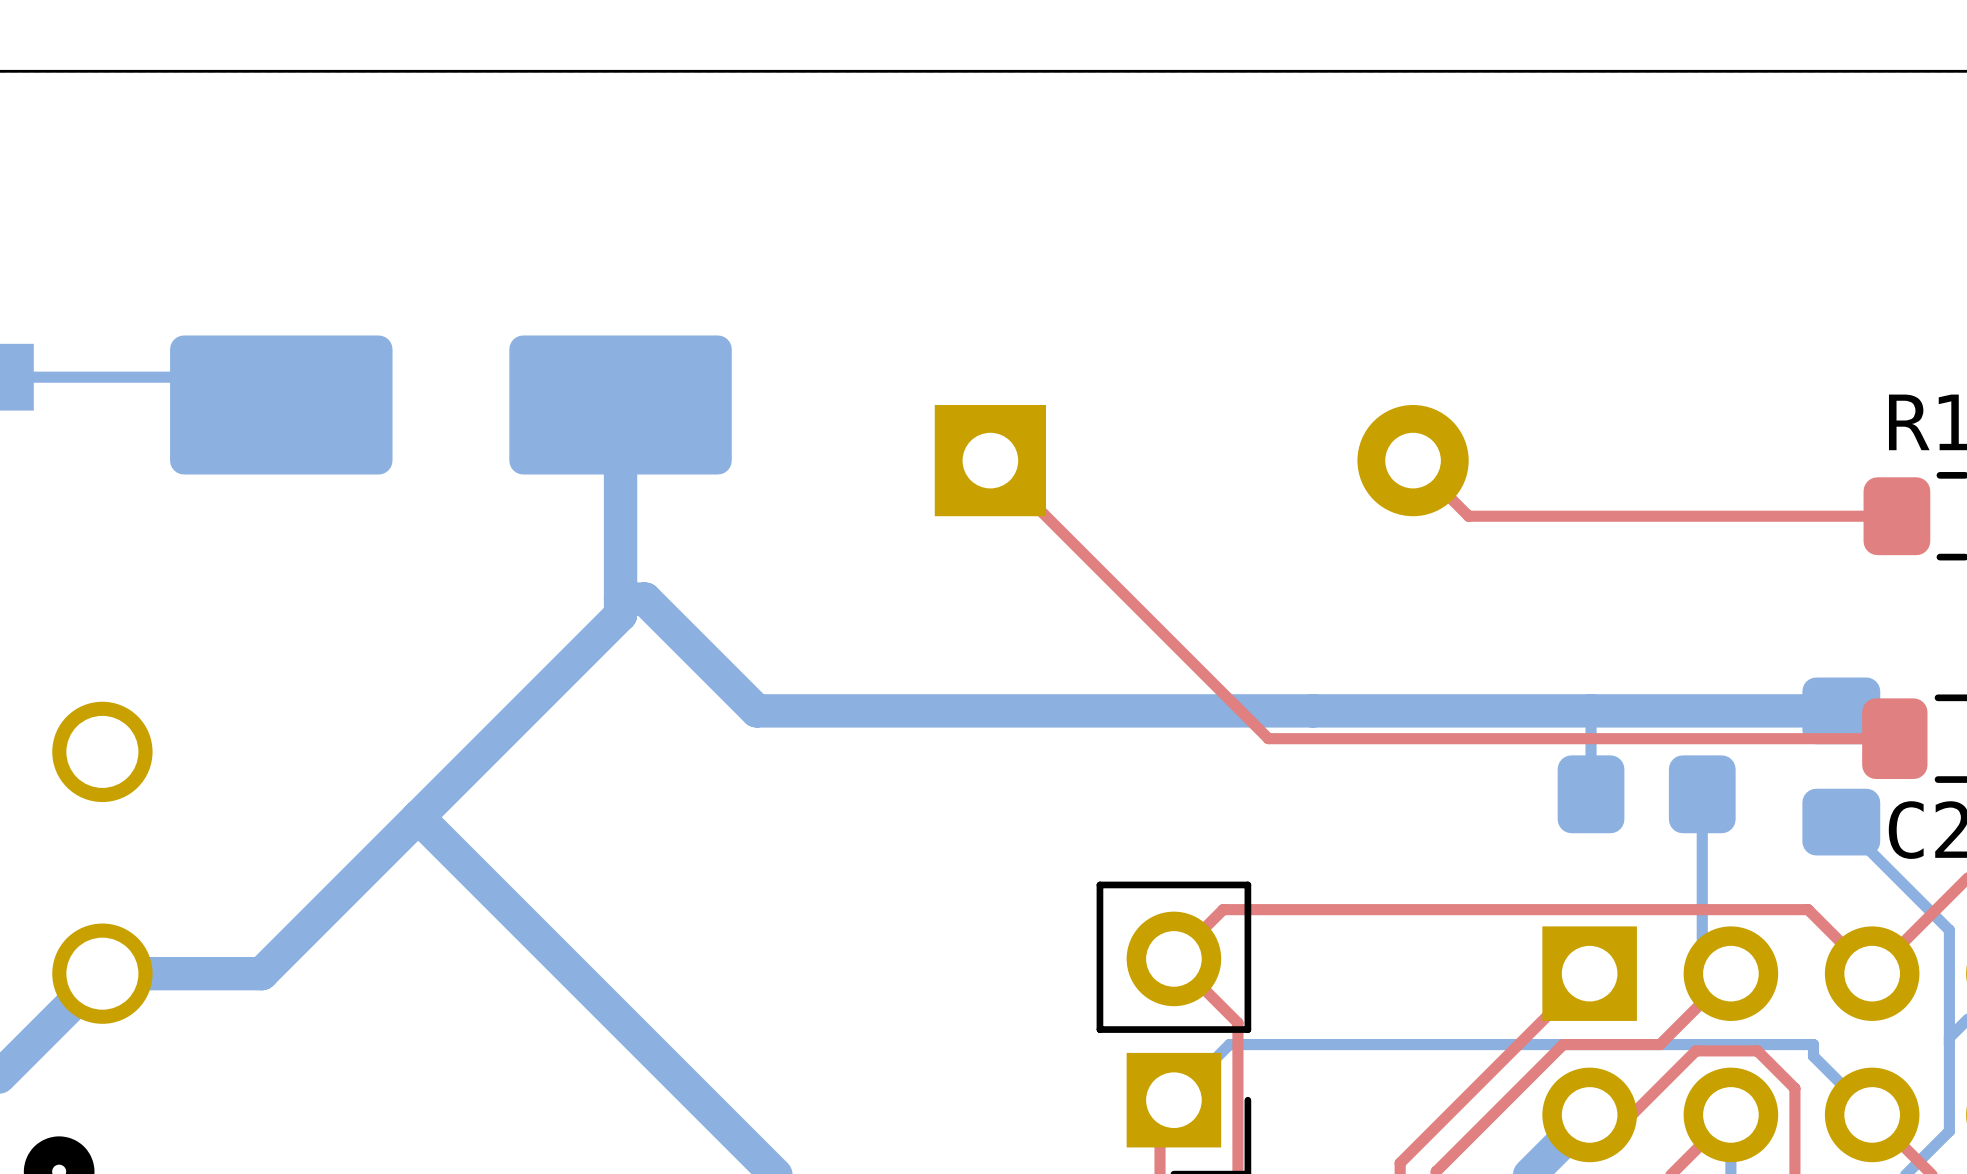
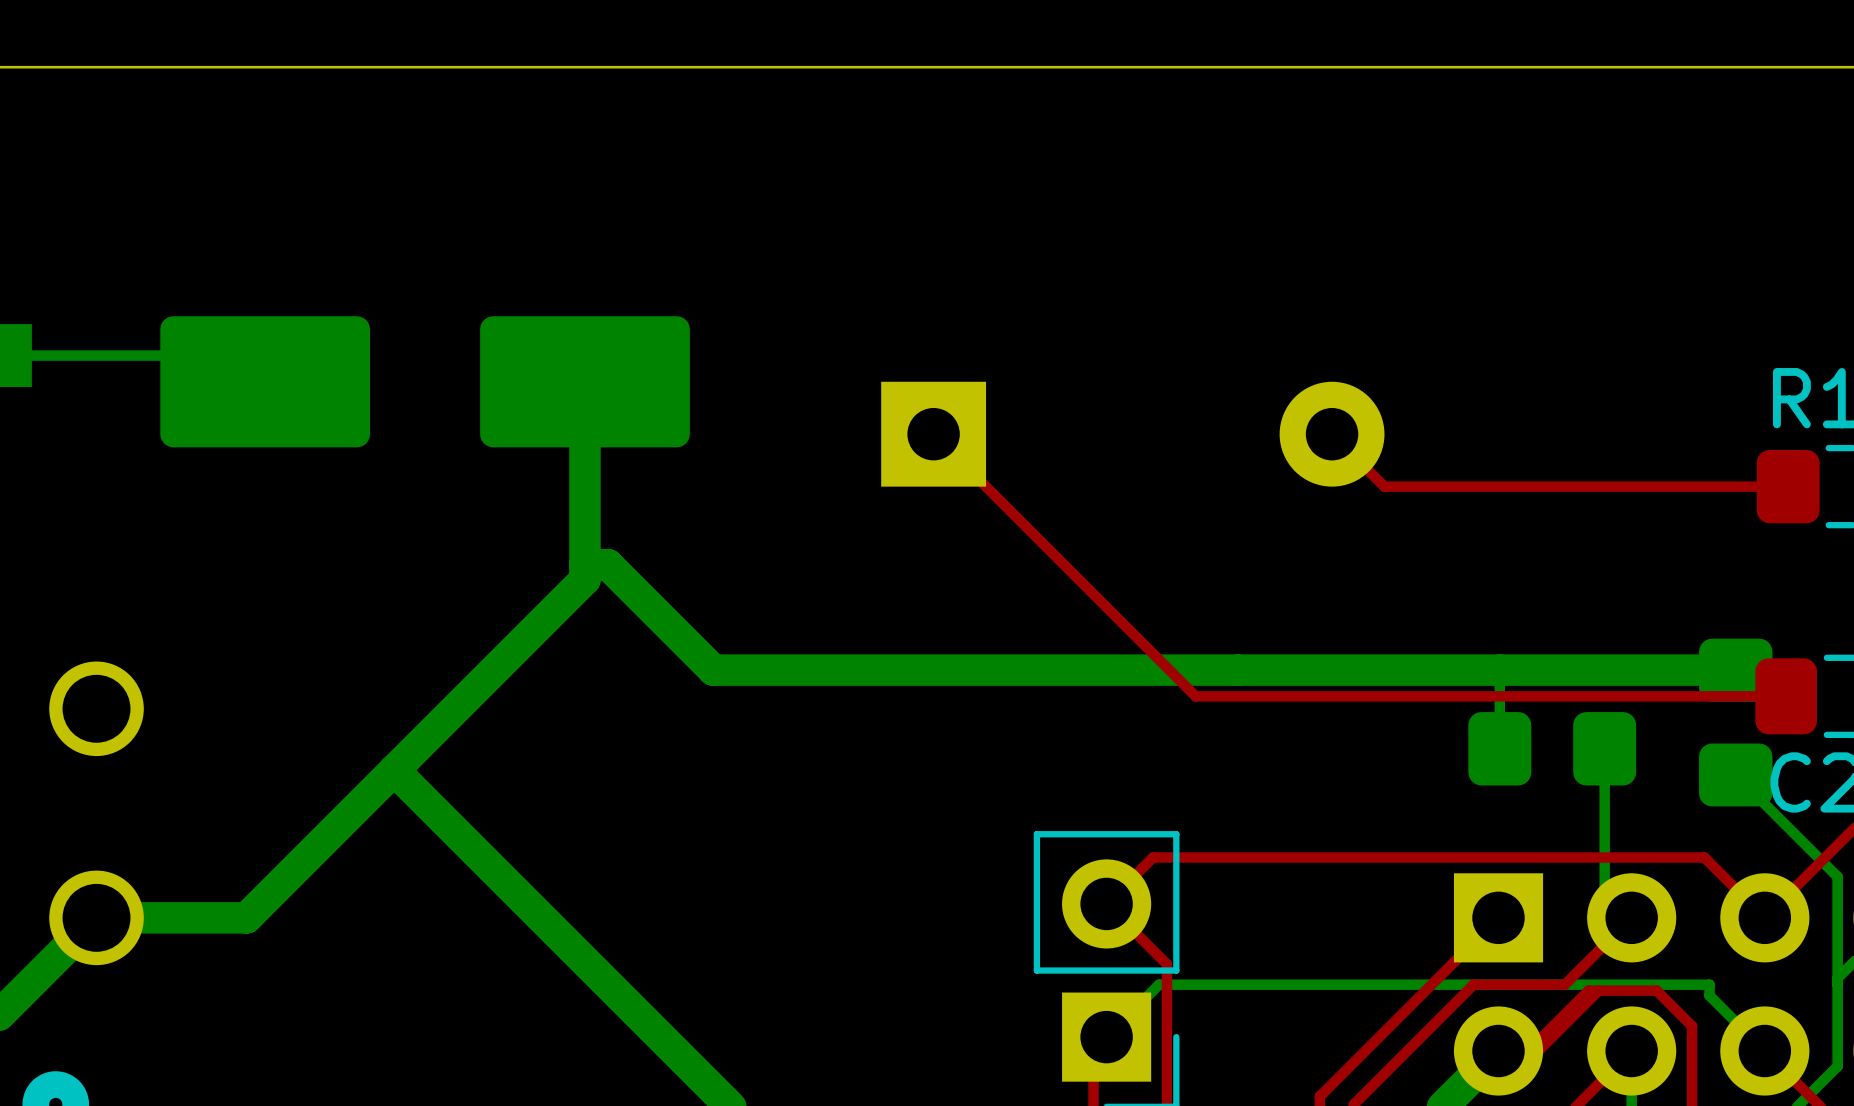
top track: none -> (1598, 990) (1588, 990) (1528, 1051)

